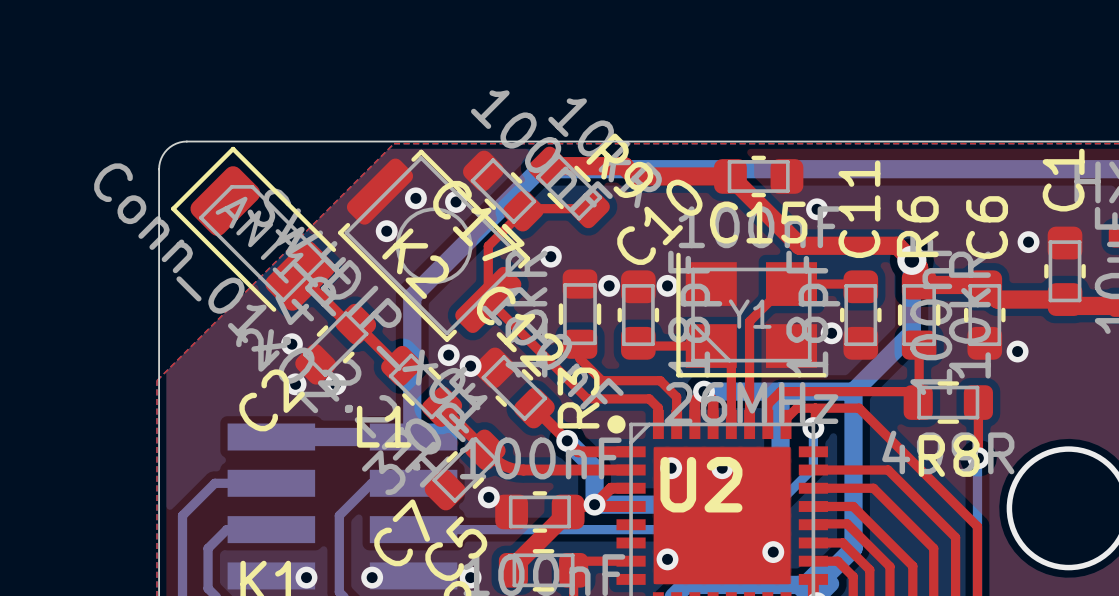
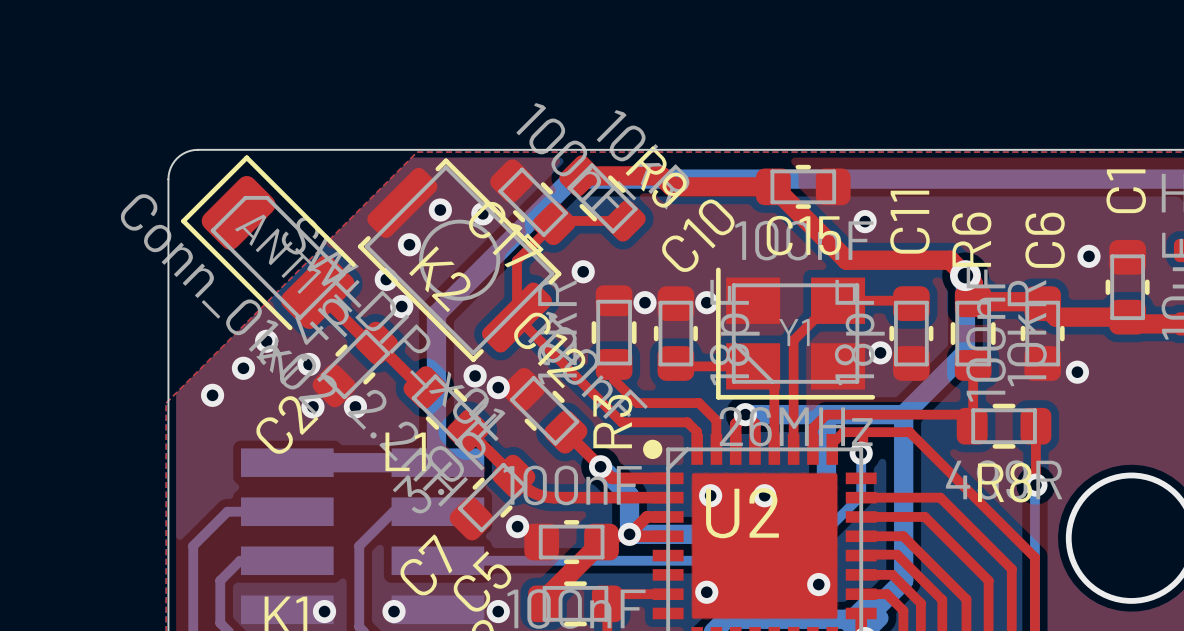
via: none -> (386, 279)
via: none -> (401, 306)
via: none -> (266, 341)
via: none -> (243, 368)
via: none -> (212, 395)

